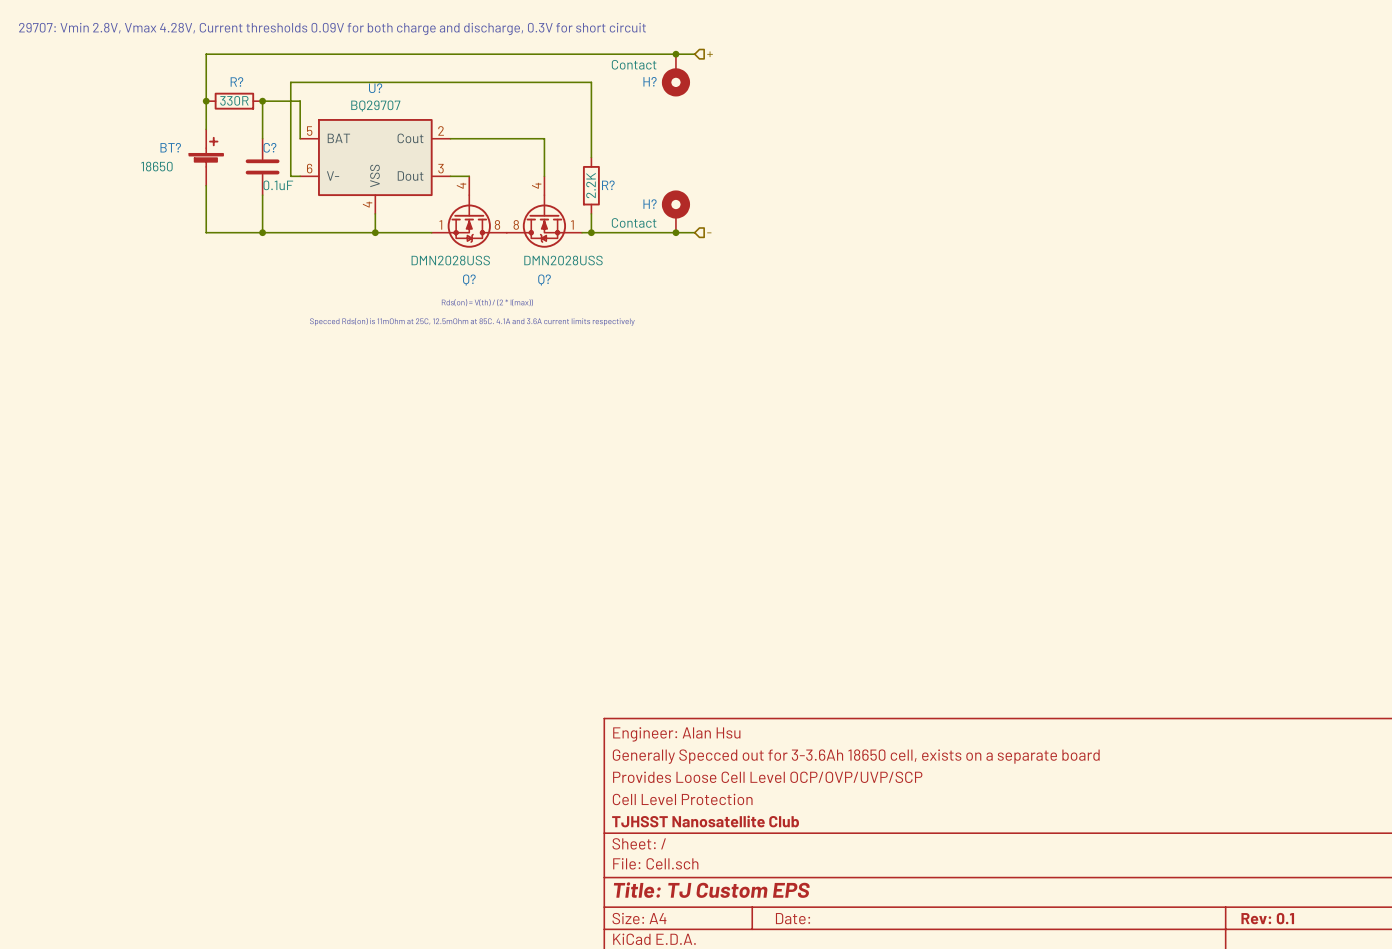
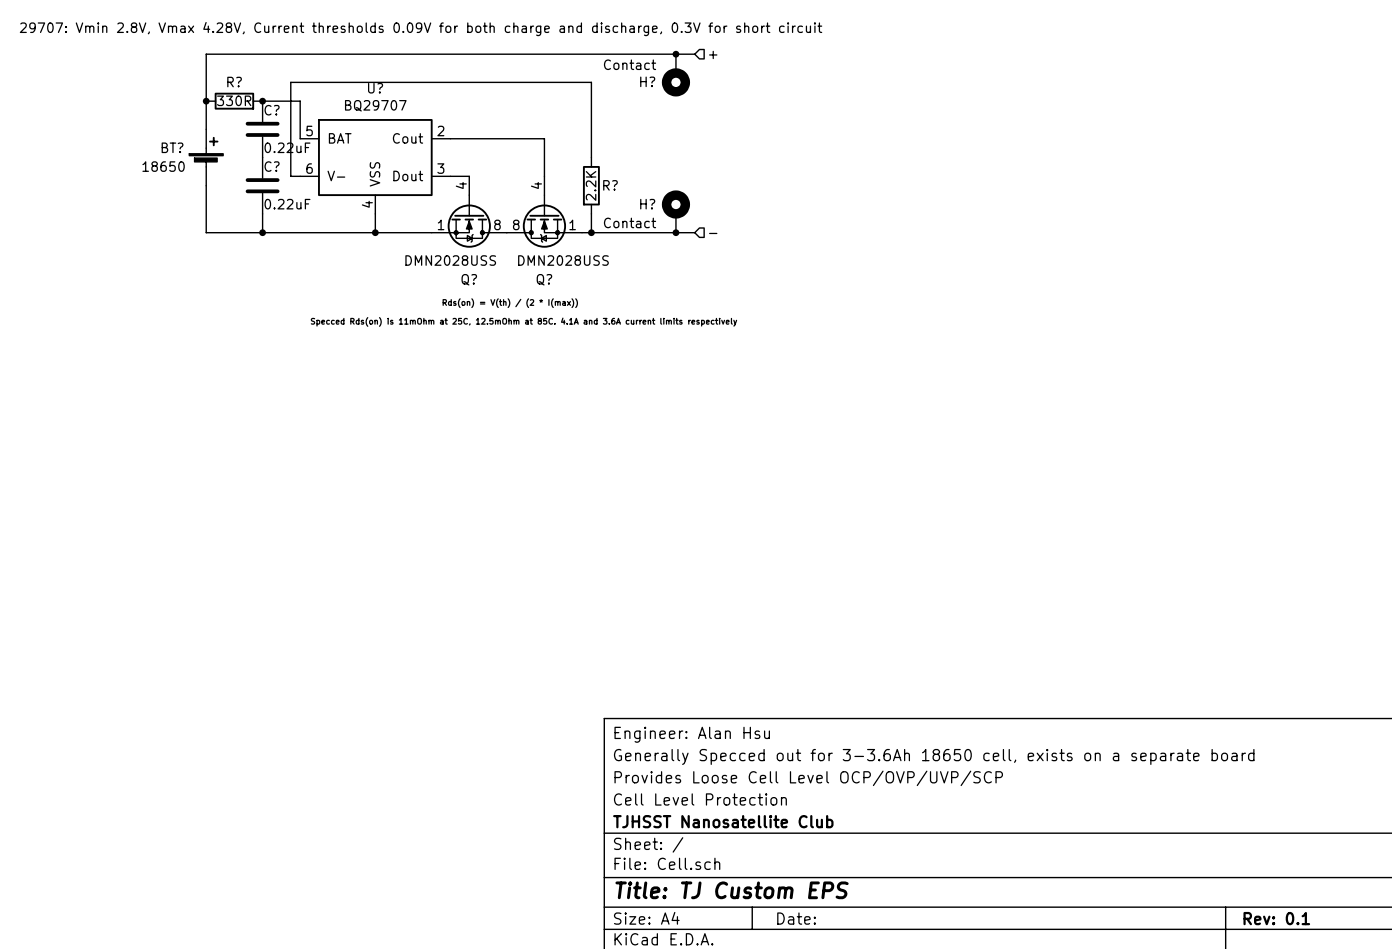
C?: none -> 0.22uF (262, 129)
C?: 0.1uF (262, 166) -> none
C?: none -> 0.22uF (262, 185)

